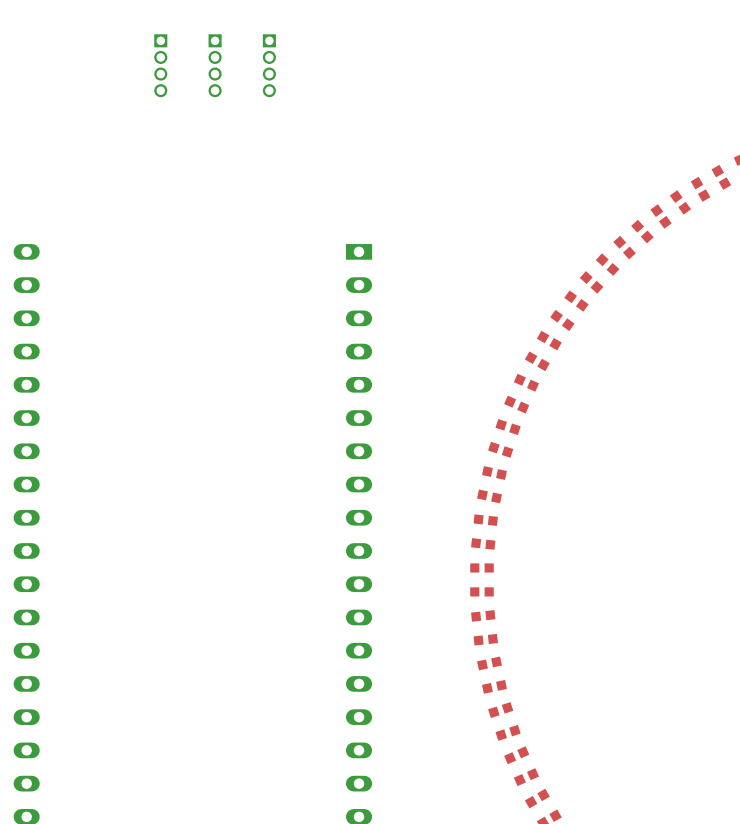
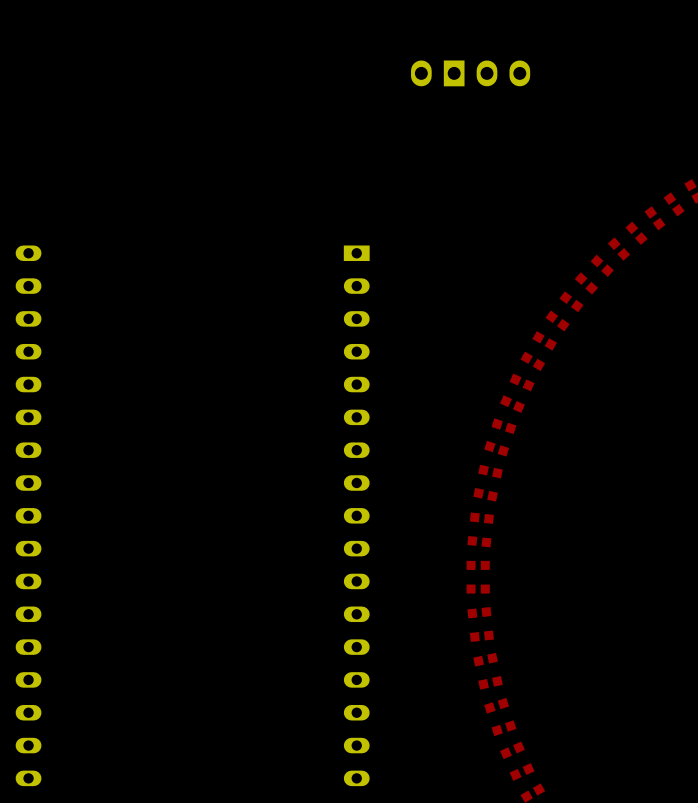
part: (160, 65) -> none
part: (215, 65) -> none
part: (269, 65) -> none
part: none -> (470, 73)

